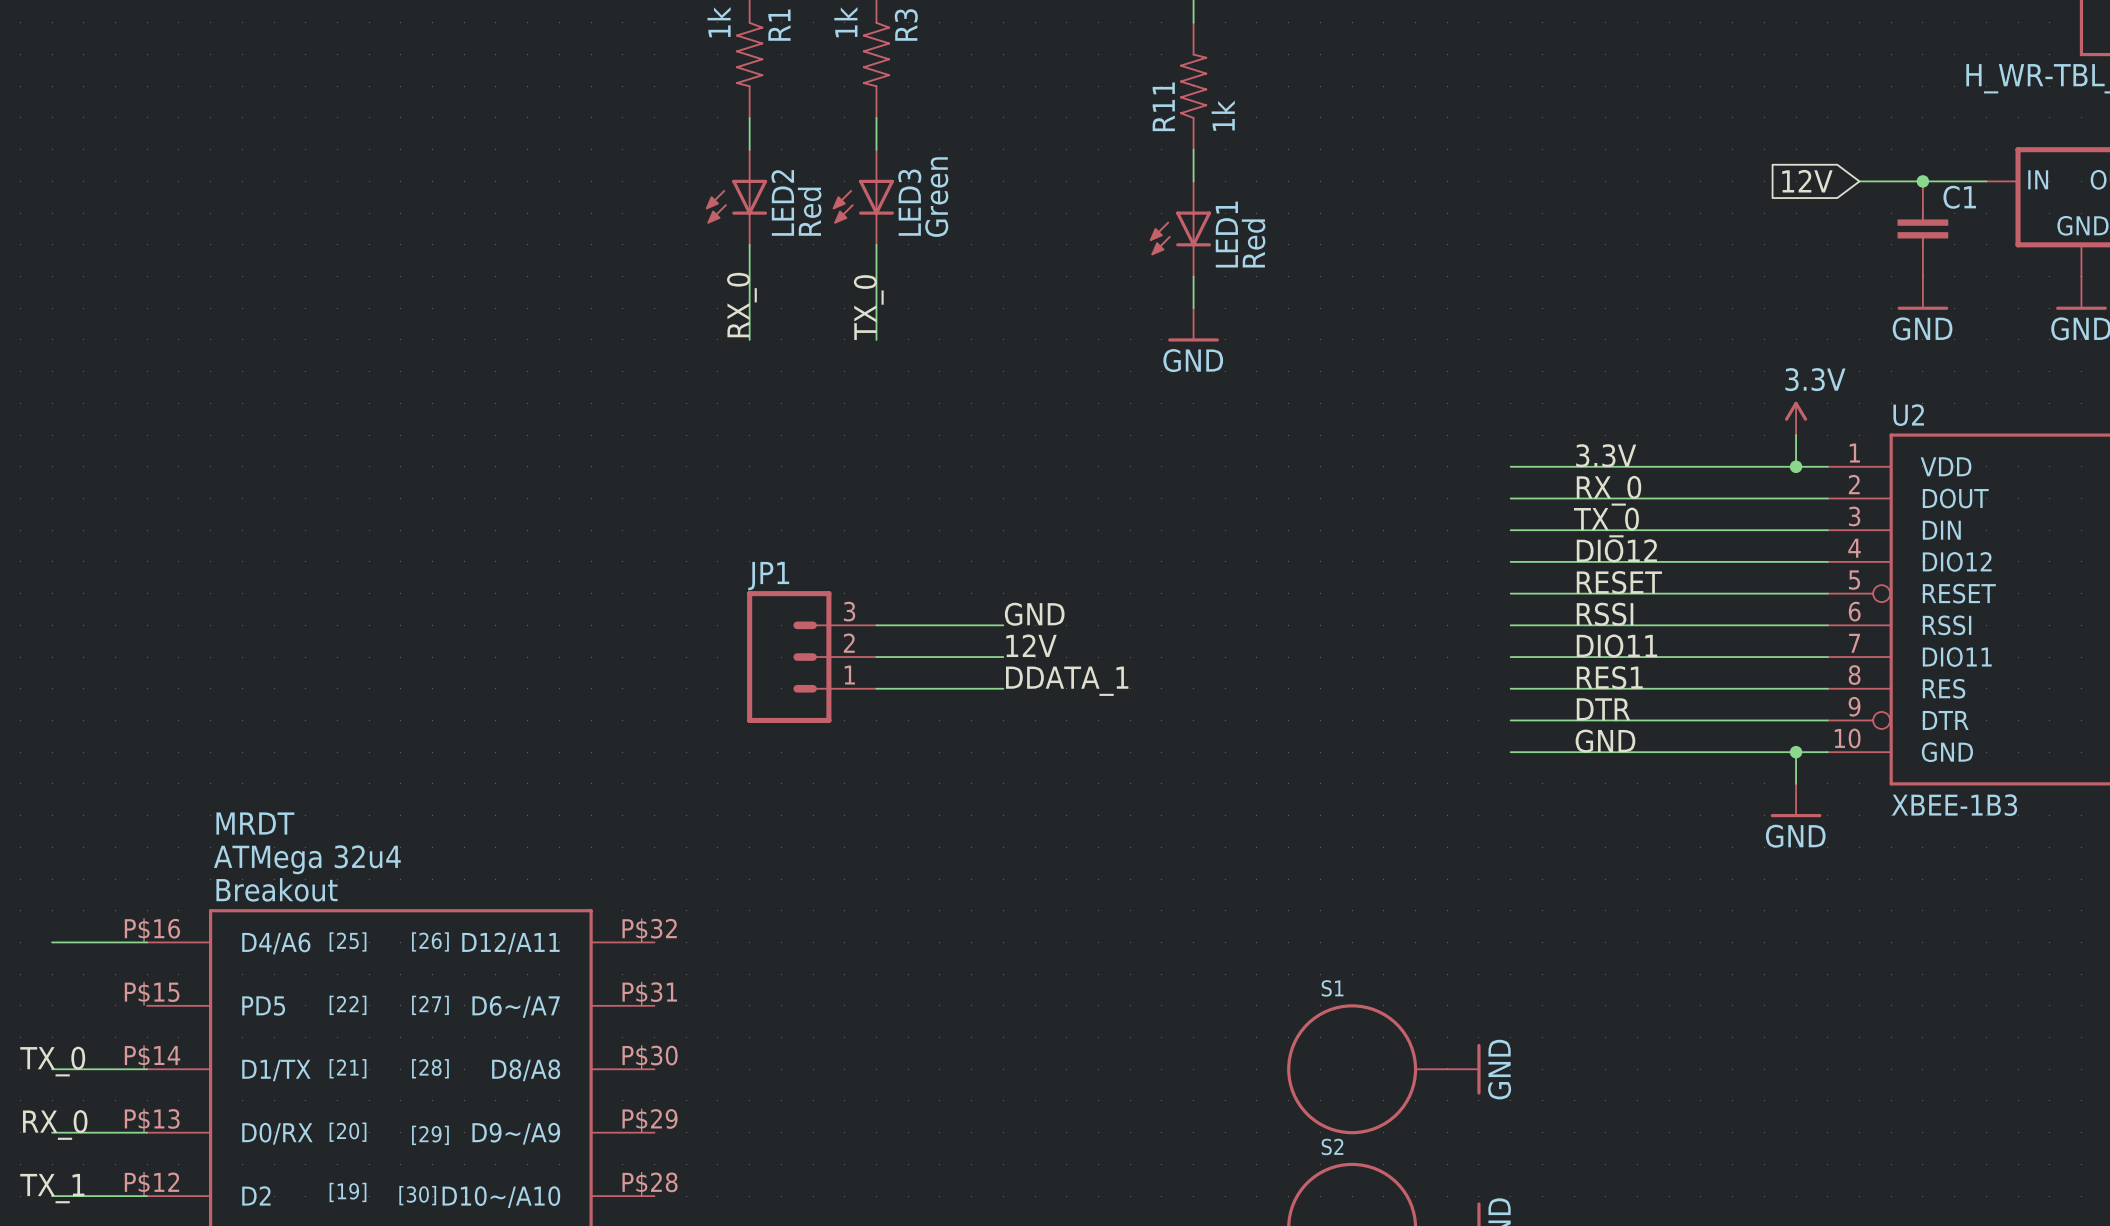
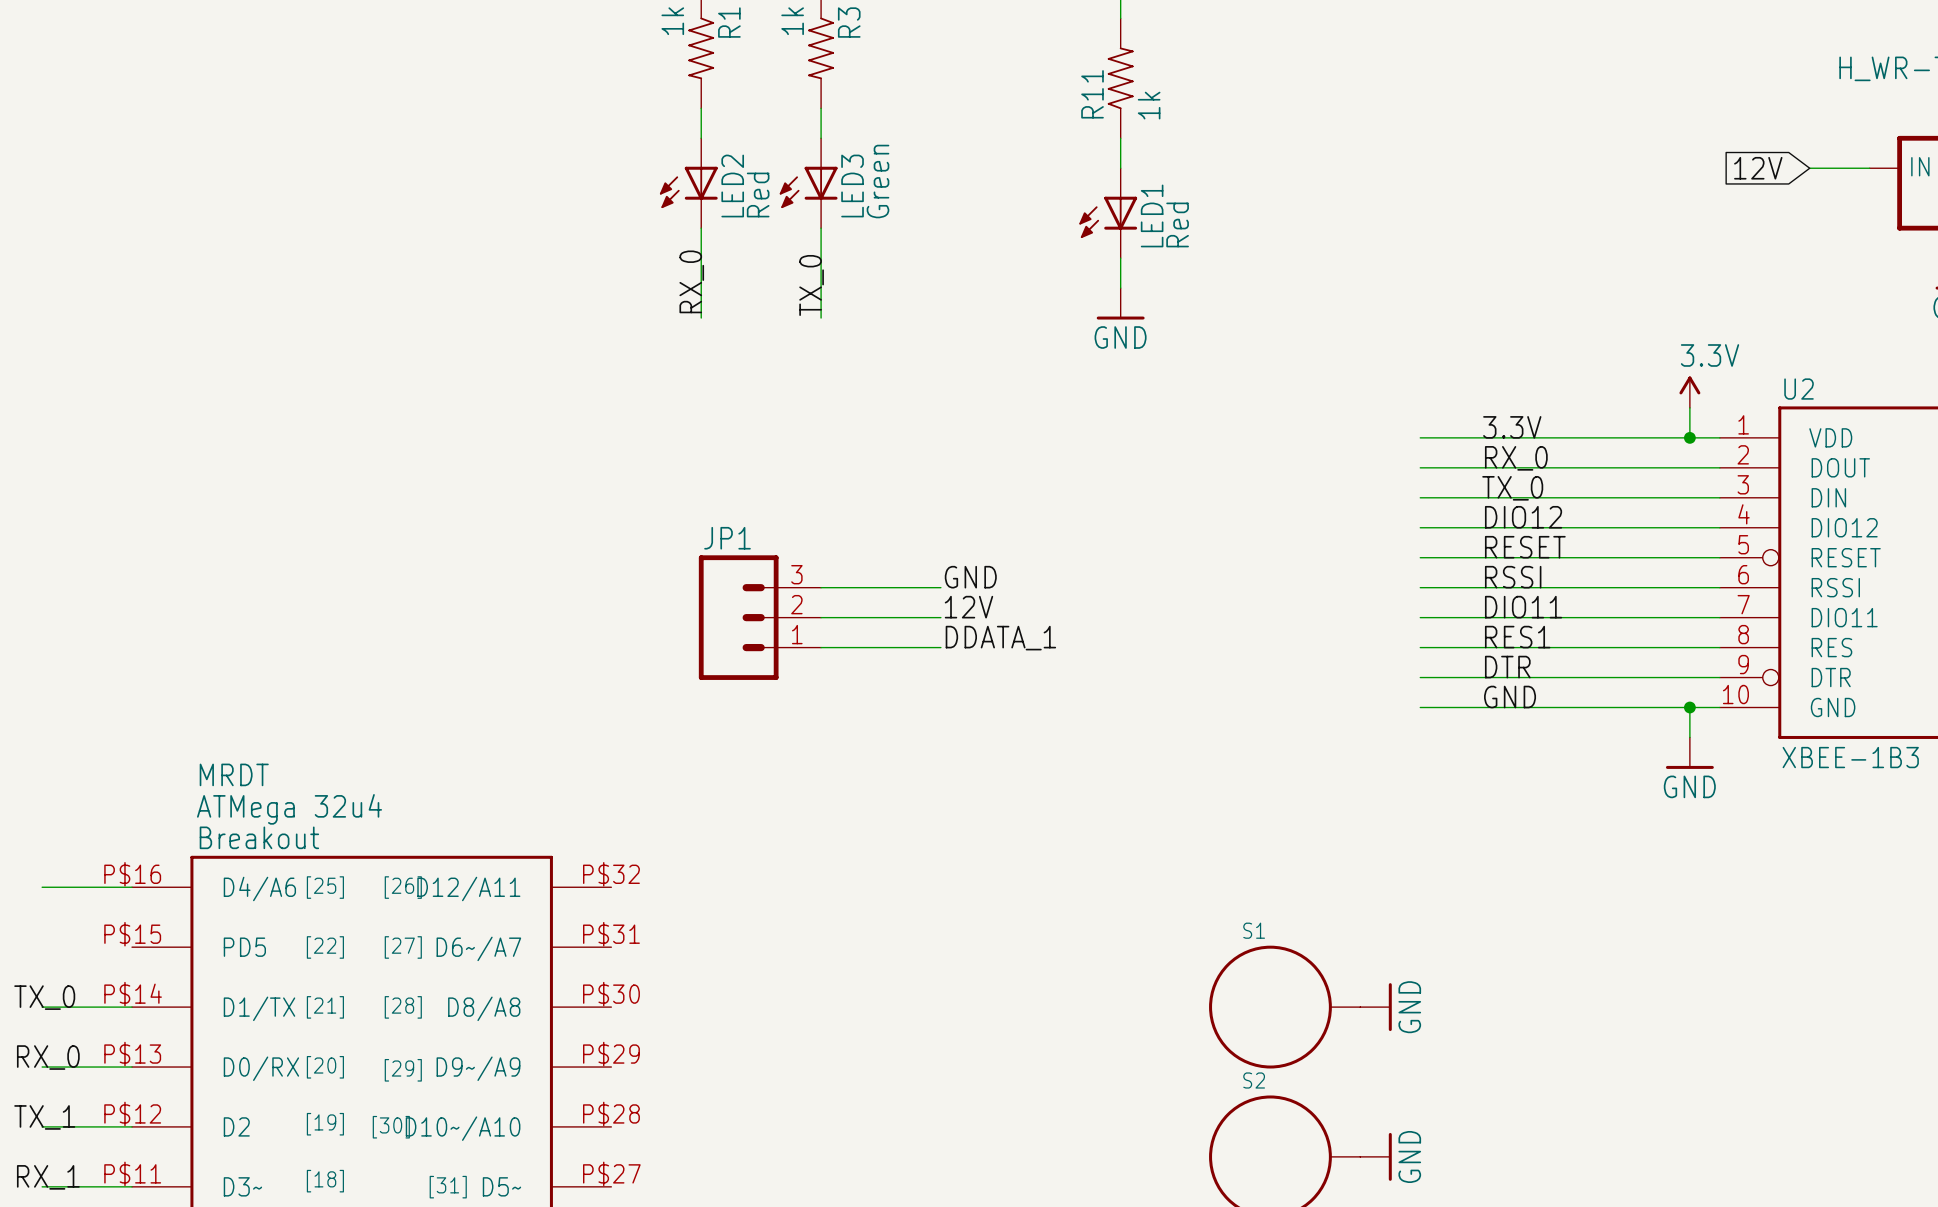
global label position: 12V (1807, 181) -> 12V (1758, 168)
wire: (1859, 181) (1922, 181) -> none
junction: (1922, 181) -> none
C1: (1922, 228) -> none
power symbol: GND (1922, 293) -> none

